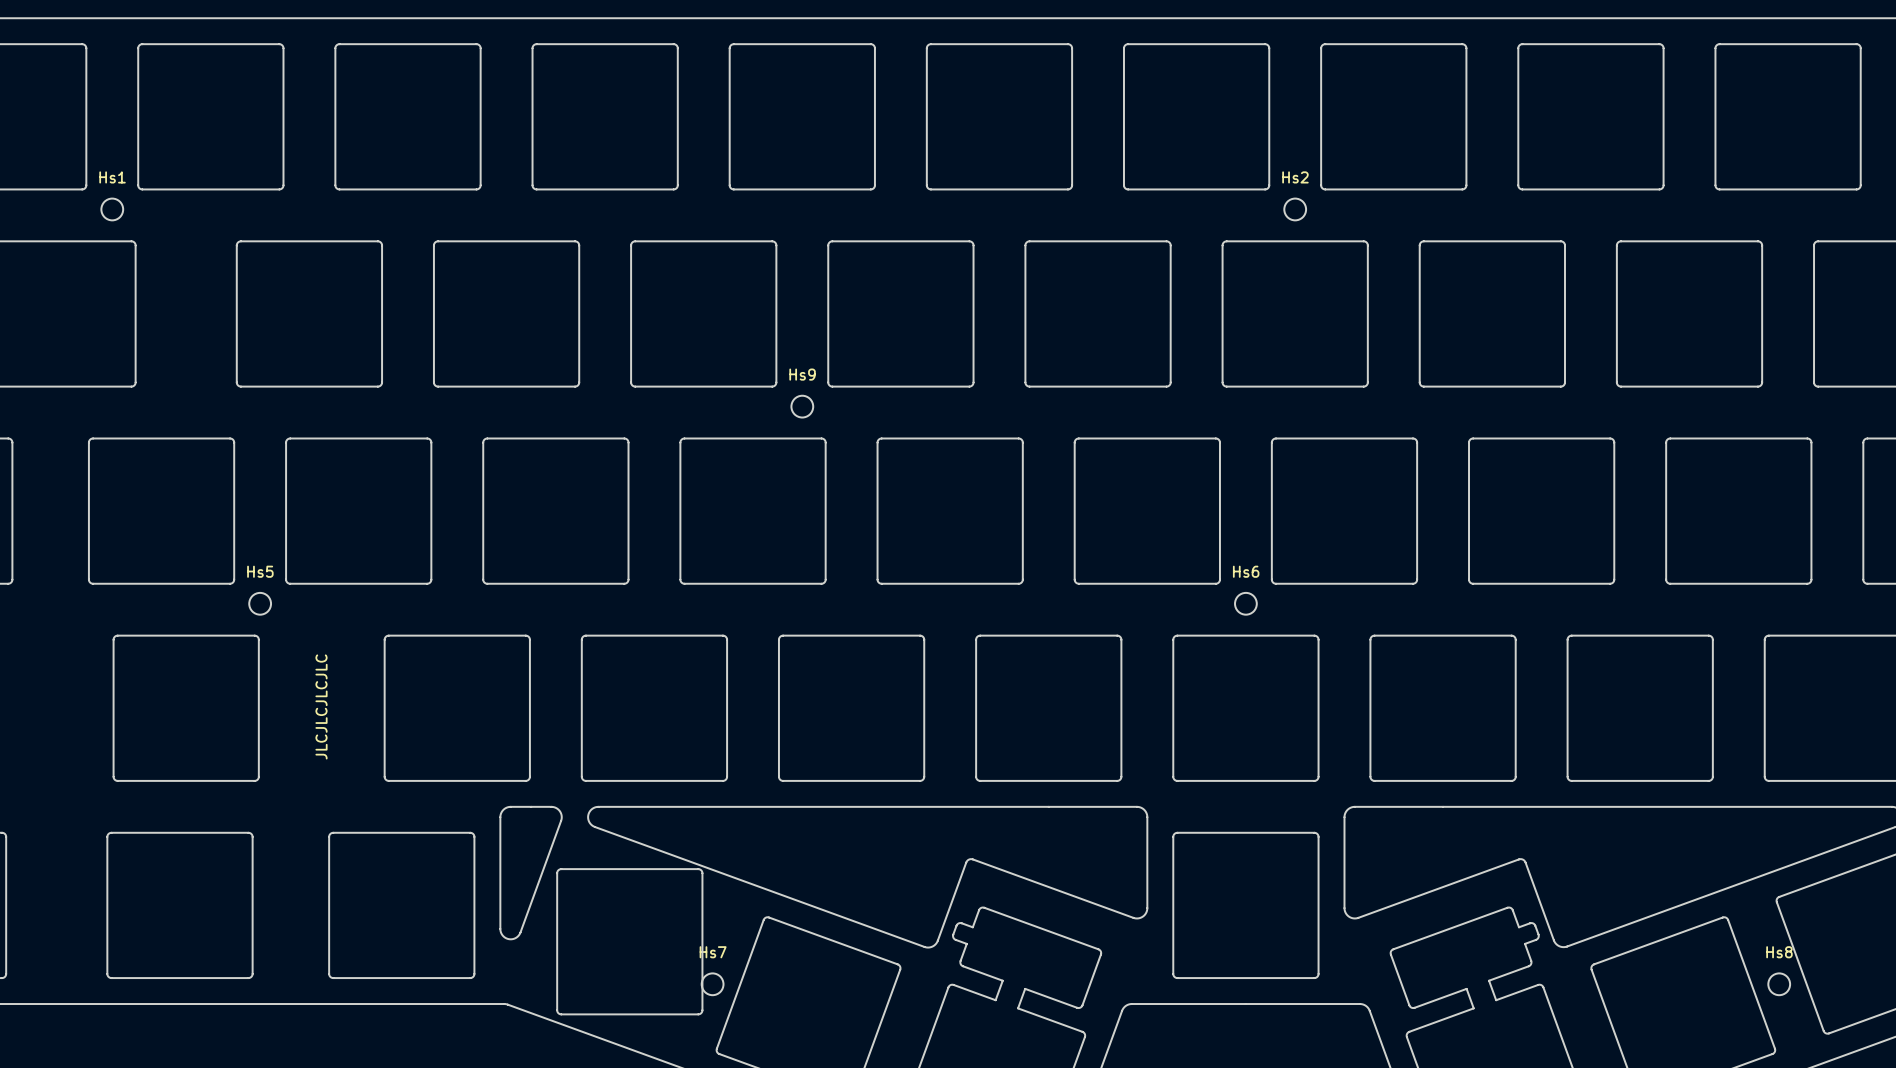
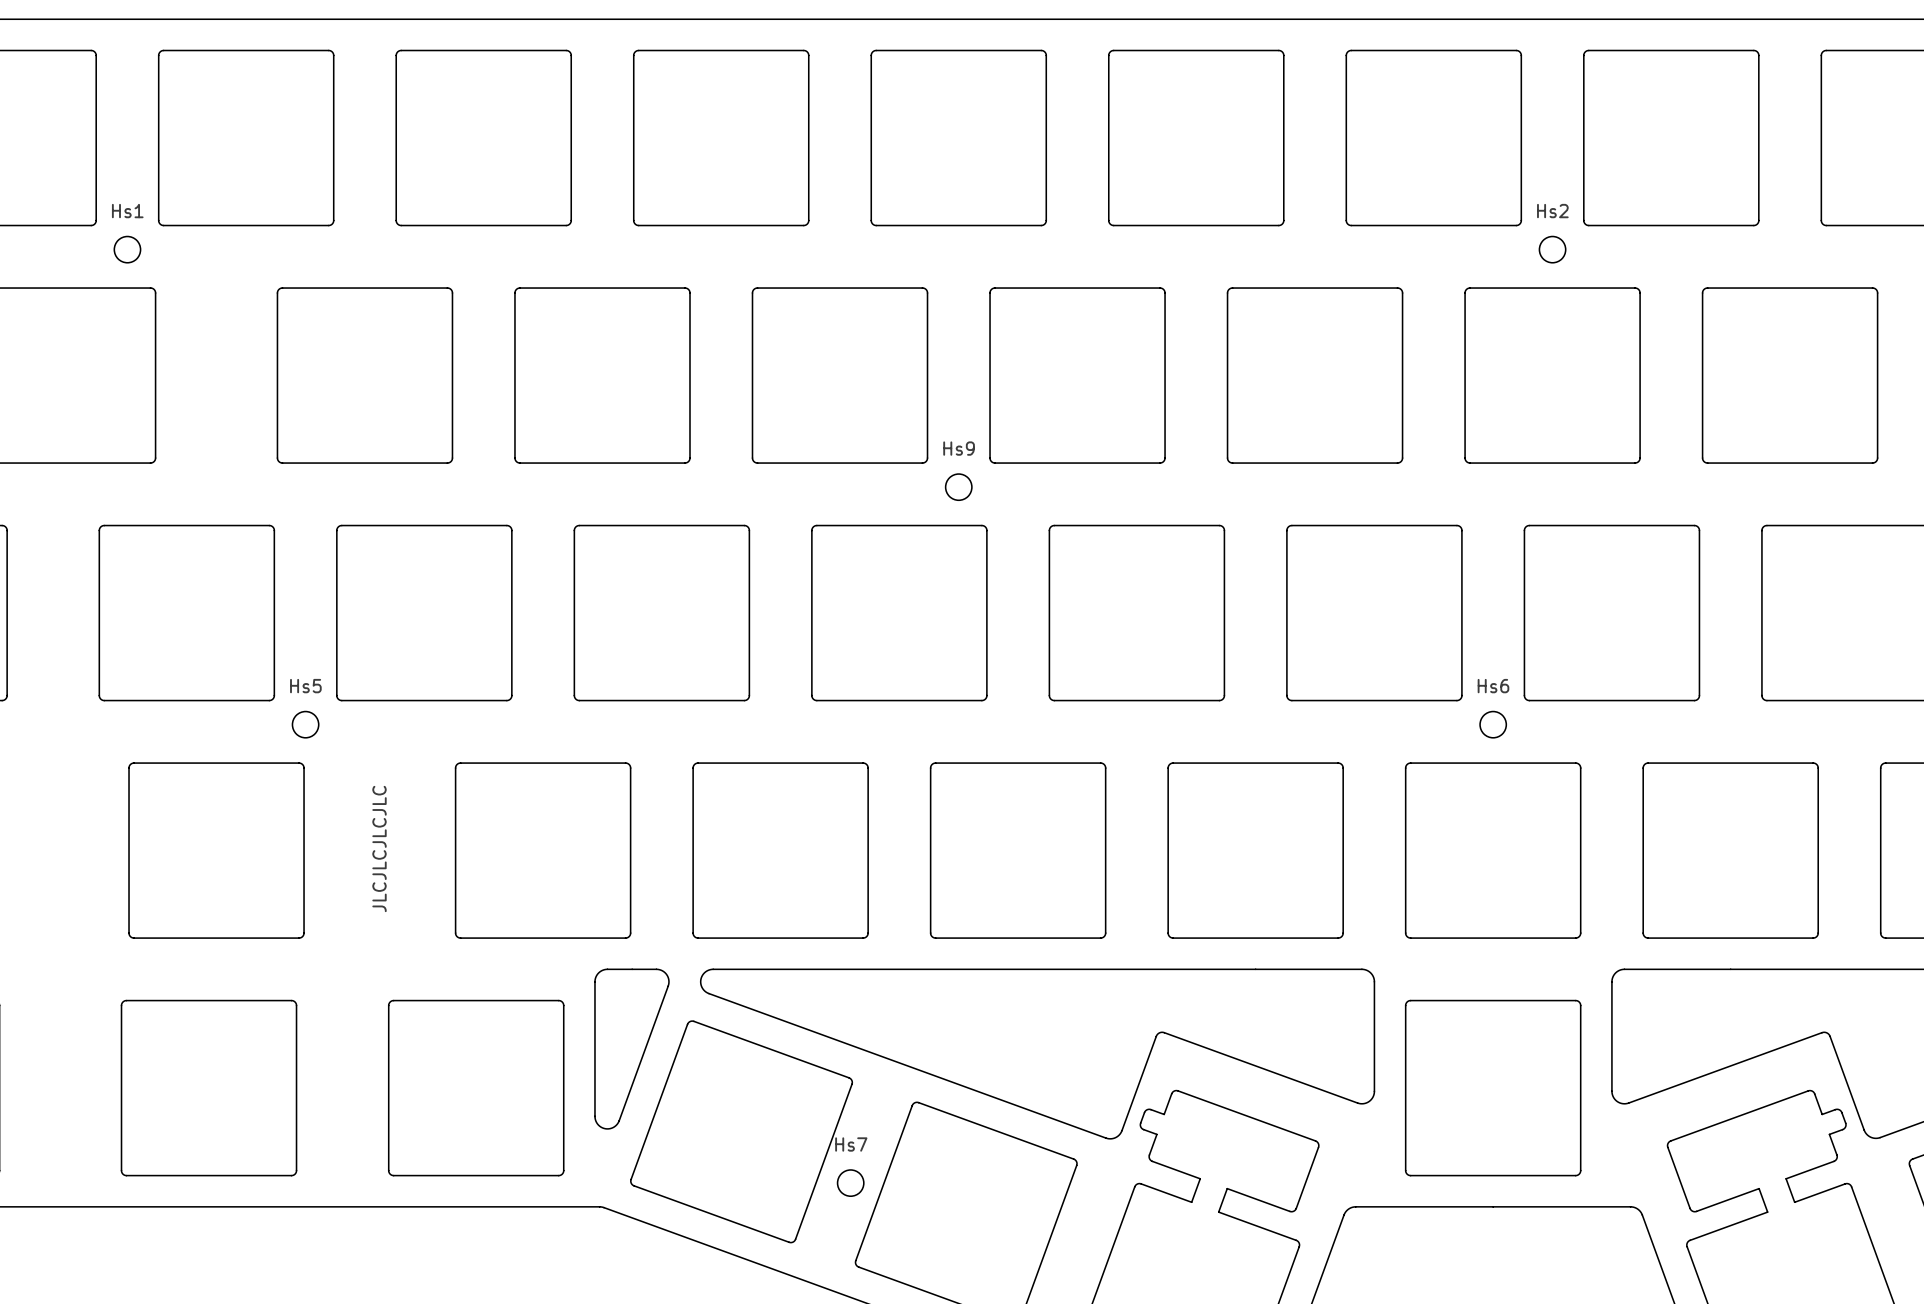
drawing shape: [556, 868, 704, 1016] -> [630, 1020, 854, 1244]

